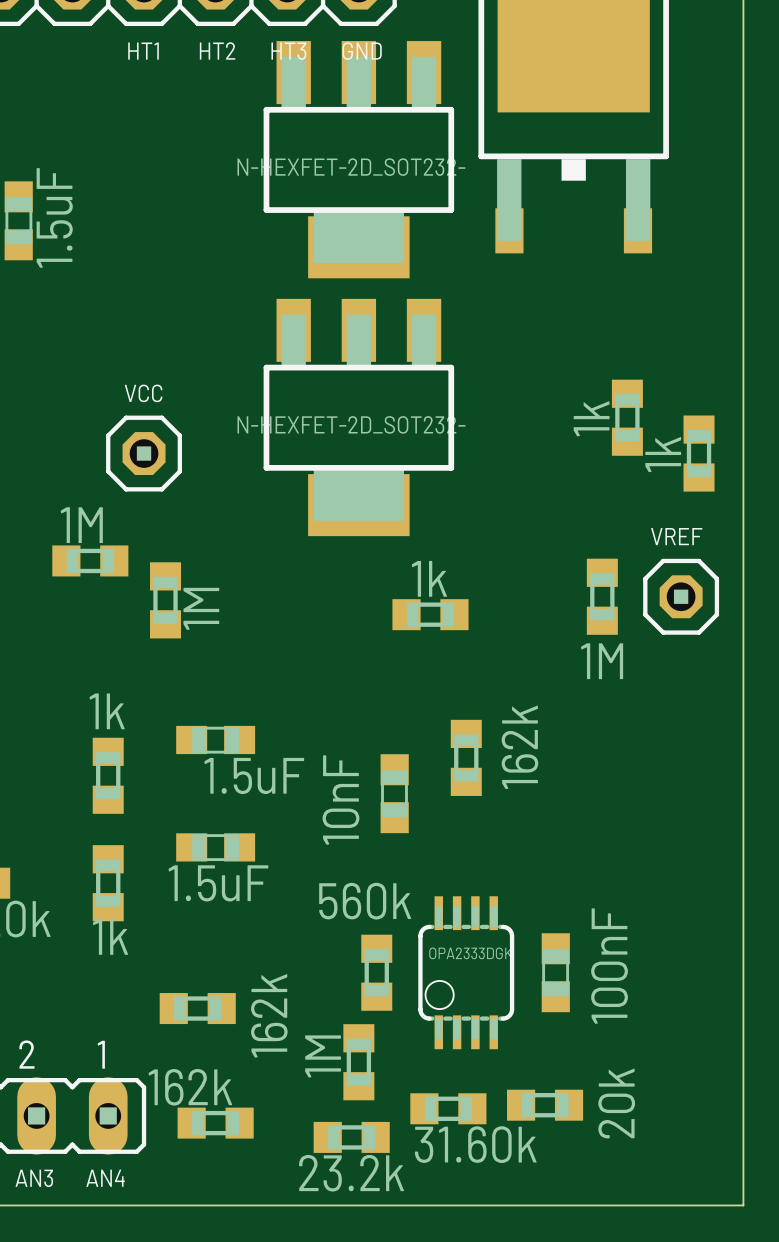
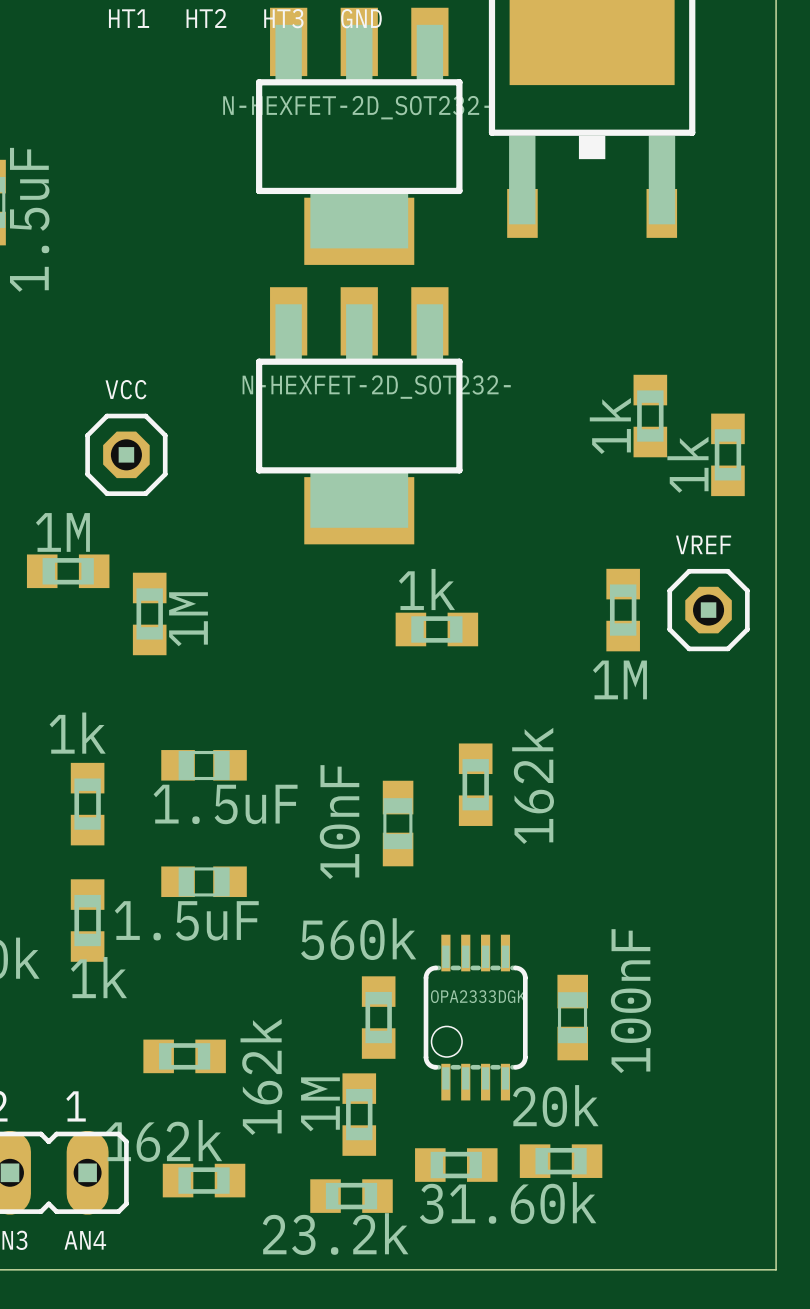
part value position: N-HEXFET-2D_SOT232- (351, 167) -> N-HEXFET-2D_SOT232- (357, 107)
part value position: N-HEXFET-2D_SOT232- (351, 424) -> N-HEXFET-2D_SOT232- (376, 387)
part value rotation: 0° (616, 1103) -> 90° clockwise (555, 1105)

